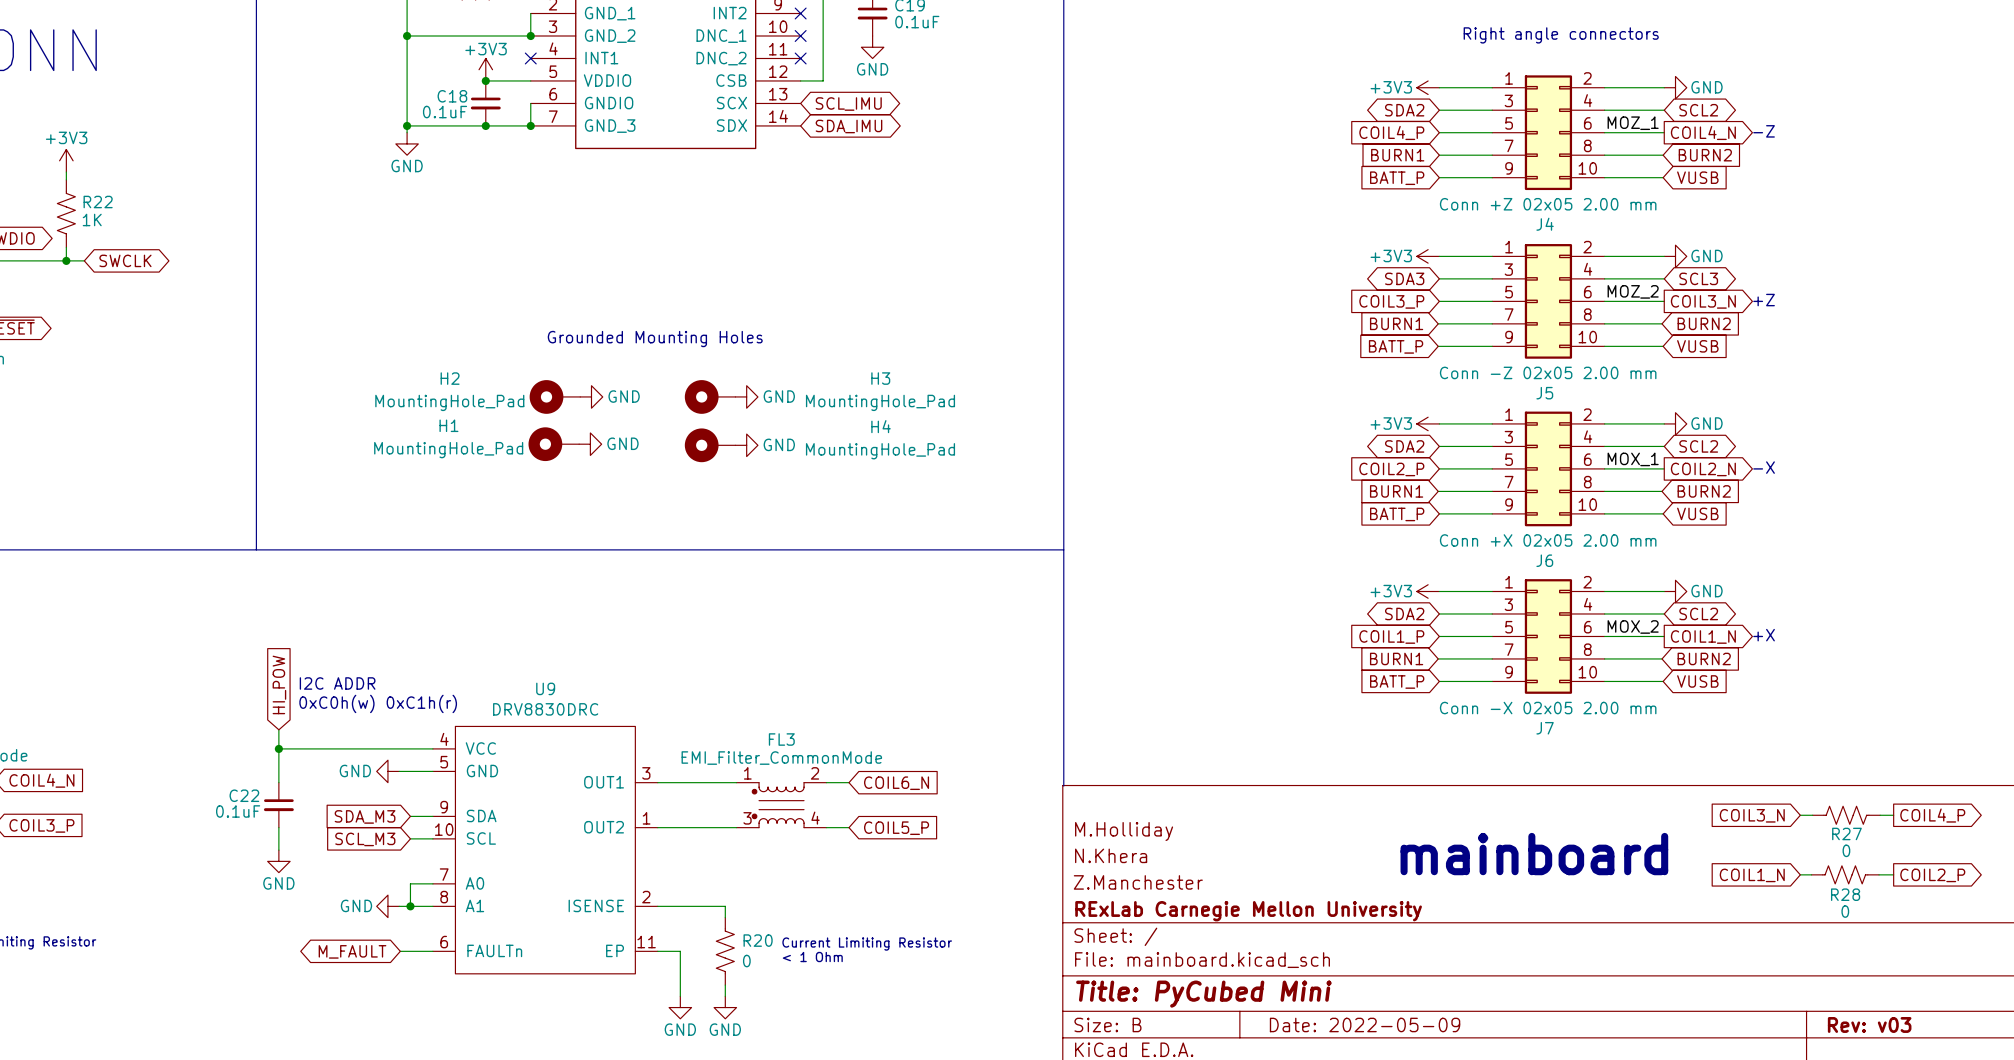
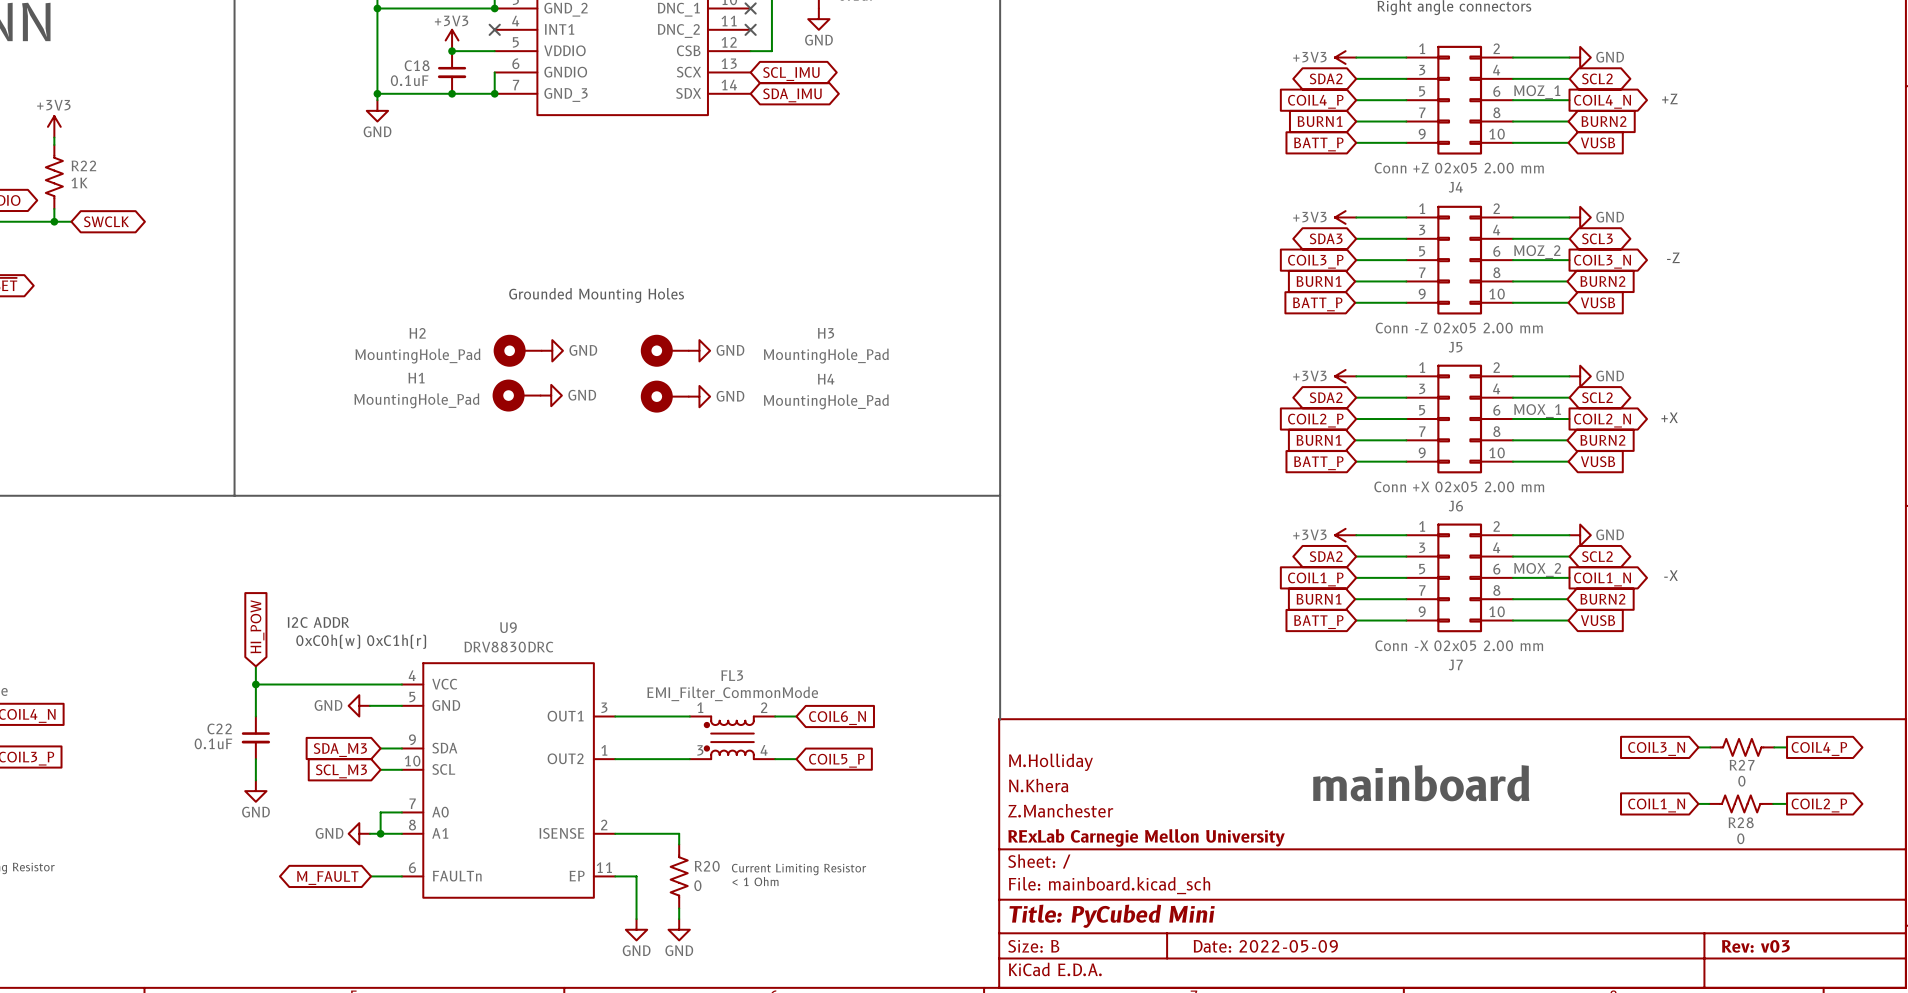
text position: -Z (1764, 131) -> -Z (1673, 257)
text position: +Z (1764, 300) -> +Z (1669, 98)
text position: -X (1764, 467) -> -X (1671, 575)
text position: +X (1764, 635) -> +X (1669, 417)

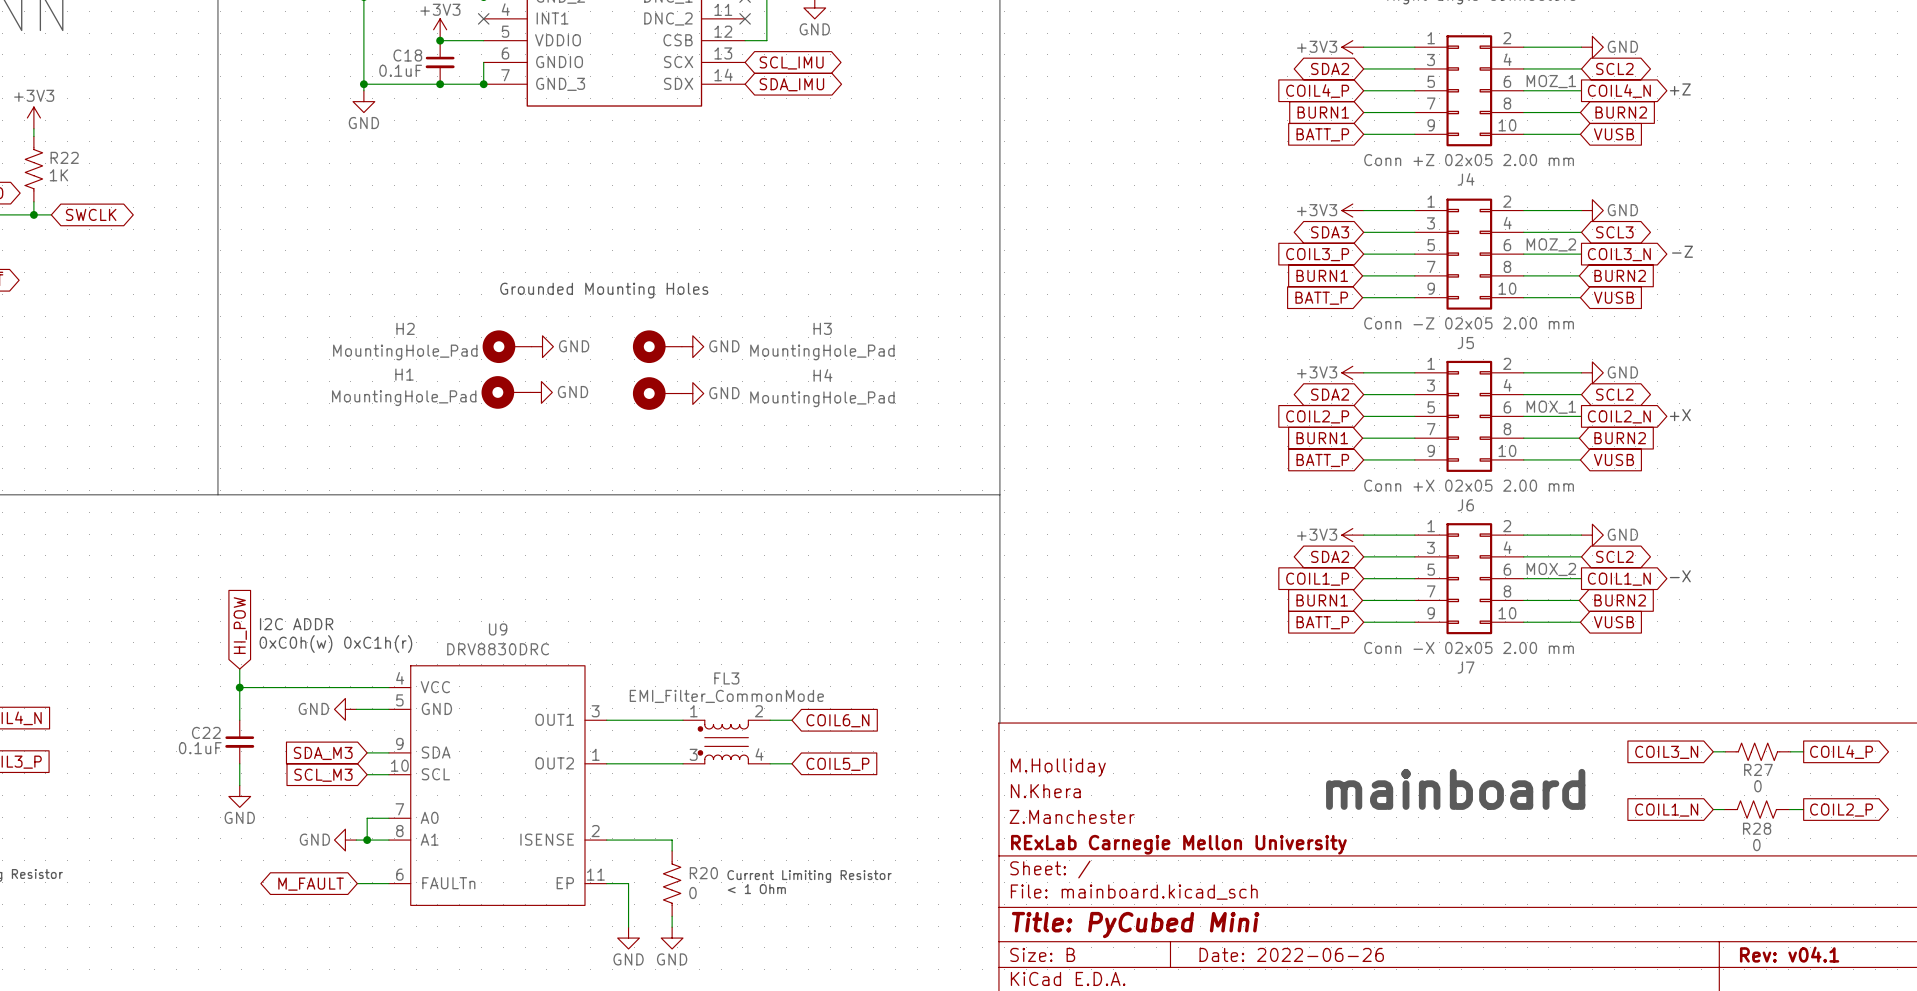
title block: Date: 2022-05-09 (1265, 946) -> Date: 2022-06-26 (1291, 954)
title block: Rev: v03 (1755, 946) -> Rev: v04.1 (1789, 954)

